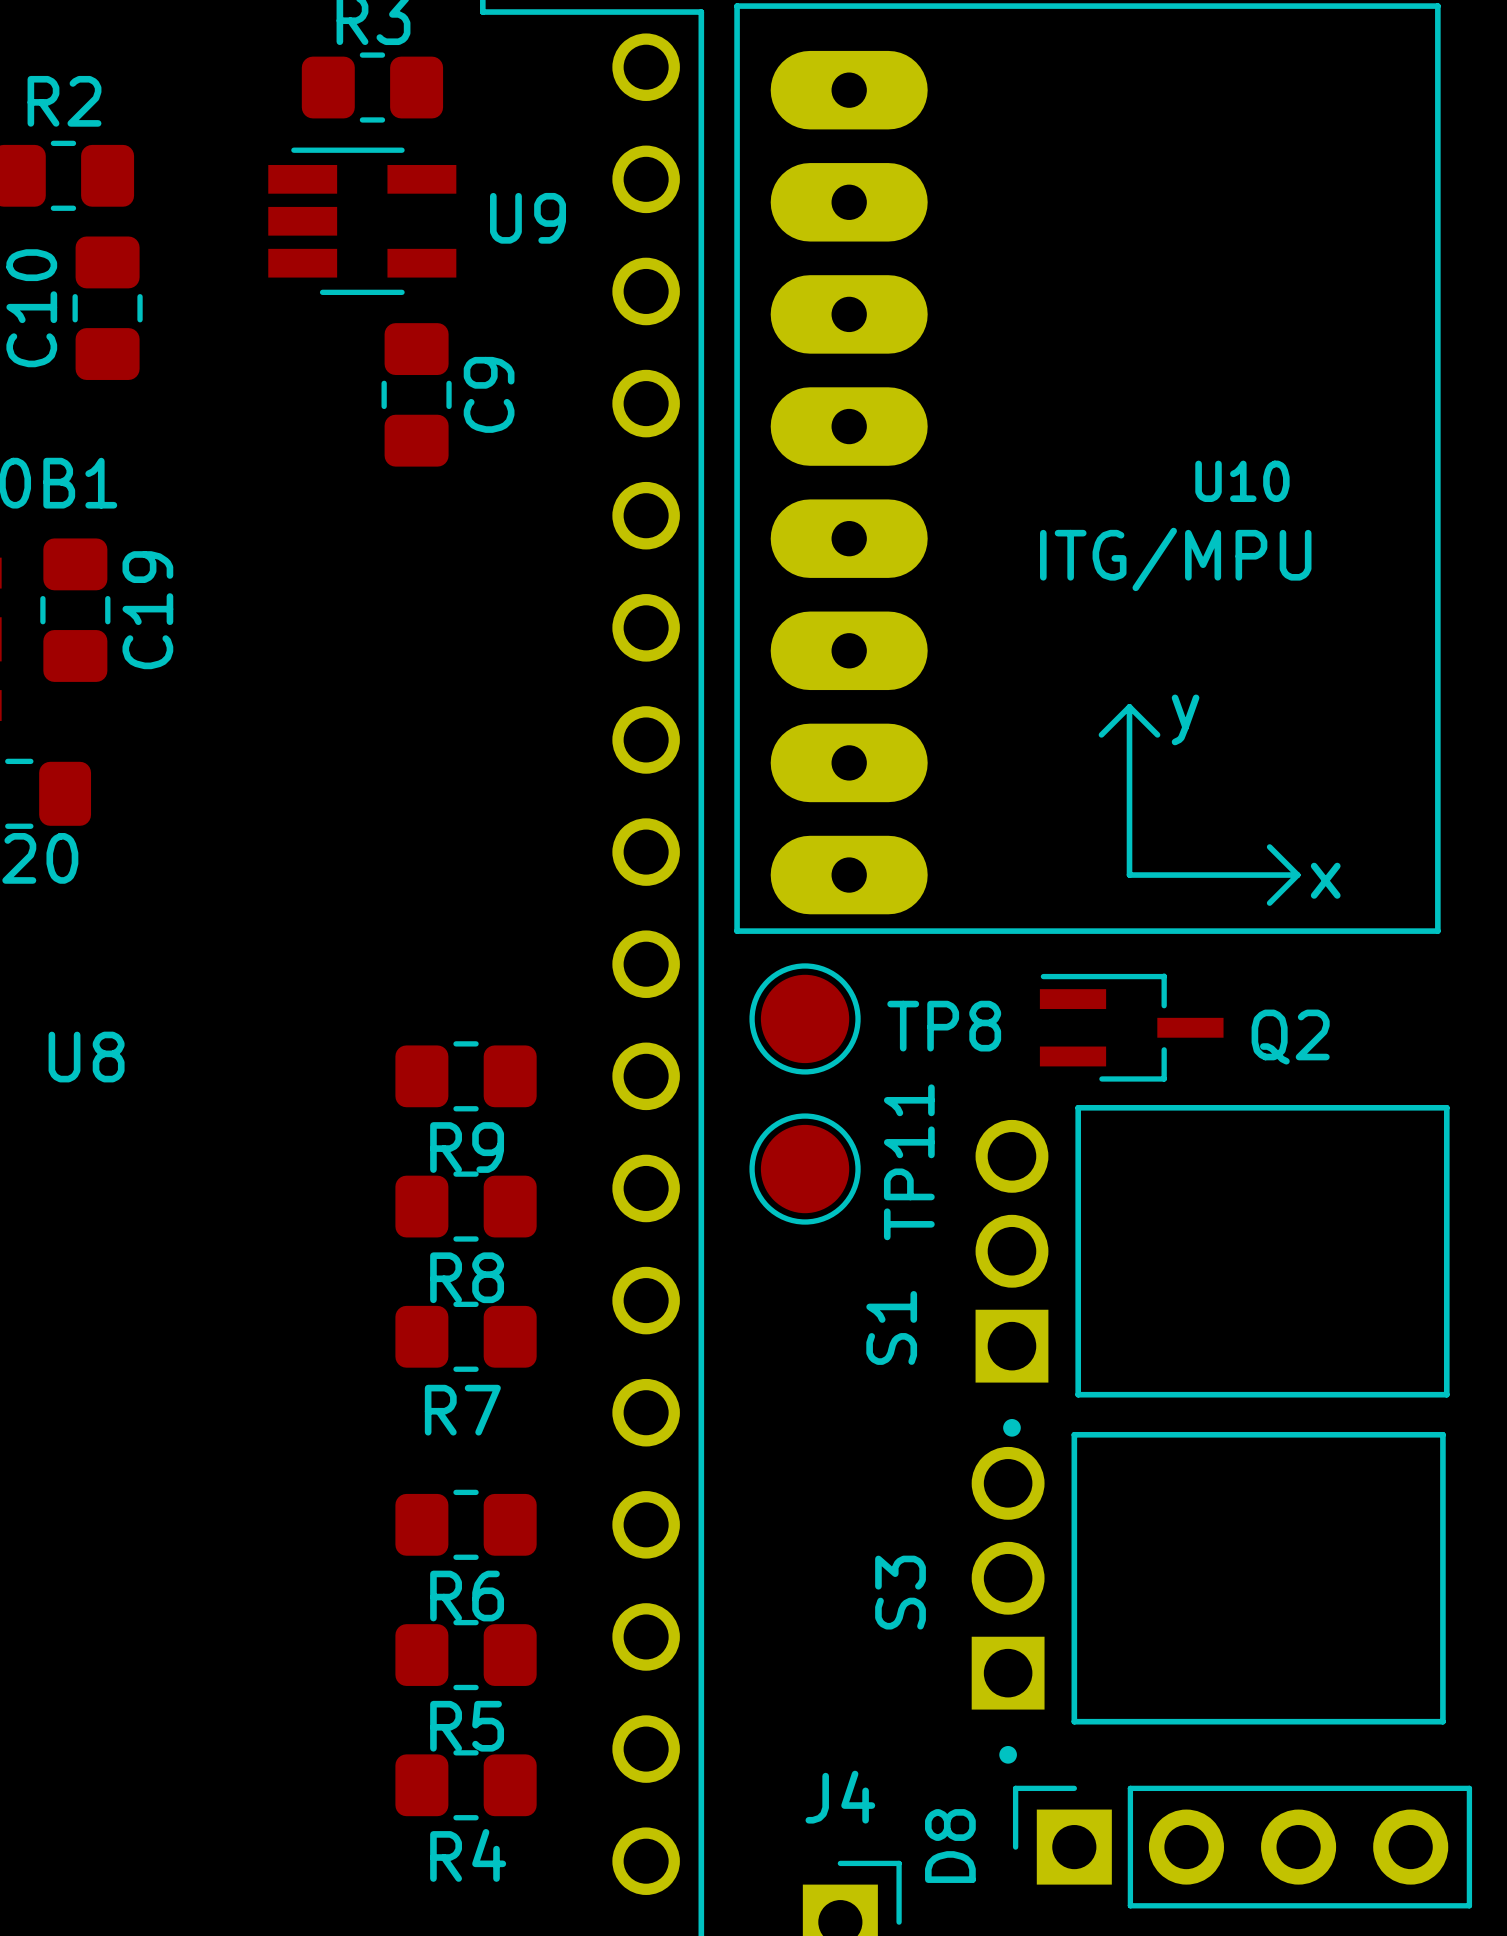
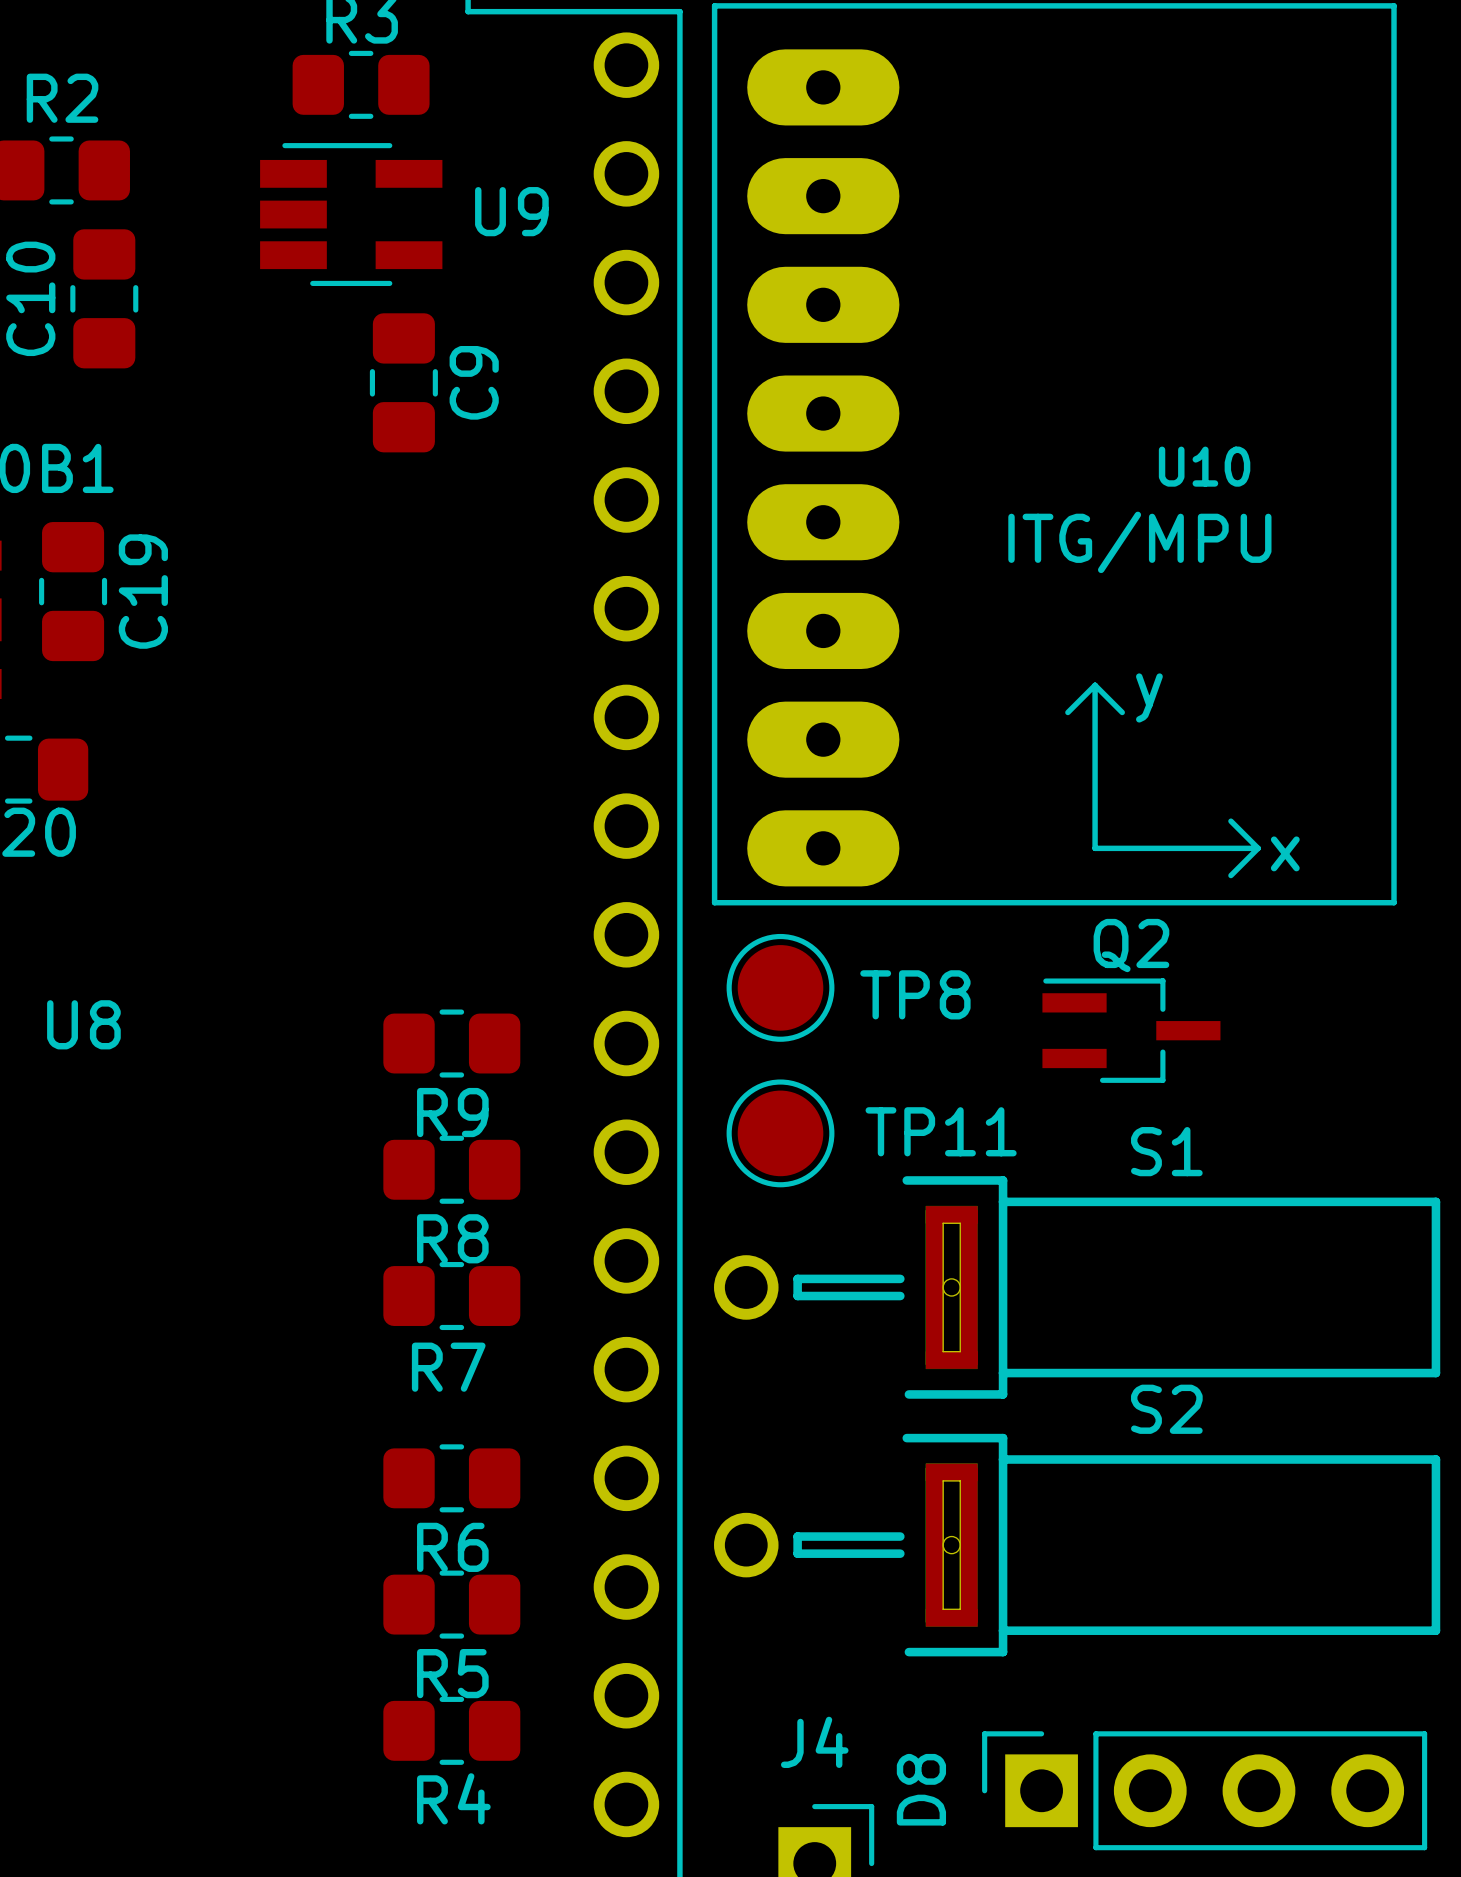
Q2 position: (1131, 1027) -> (1131, 1030)
Q2 name position: Q2 (1290, 1037) -> Q2 (1131, 945)
S1 footprint: [975, 1104, 1450, 1437] -> [714, 1176, 1441, 1399]
TP11 name rotation: 0° (909, 1162) -> 90° clockwise (941, 1131)
S1 name position: S1 (891, 1327) -> S1 (1166, 1151)
S2: none -> (1077, 1545)
S3: (1208, 1597) -> none

